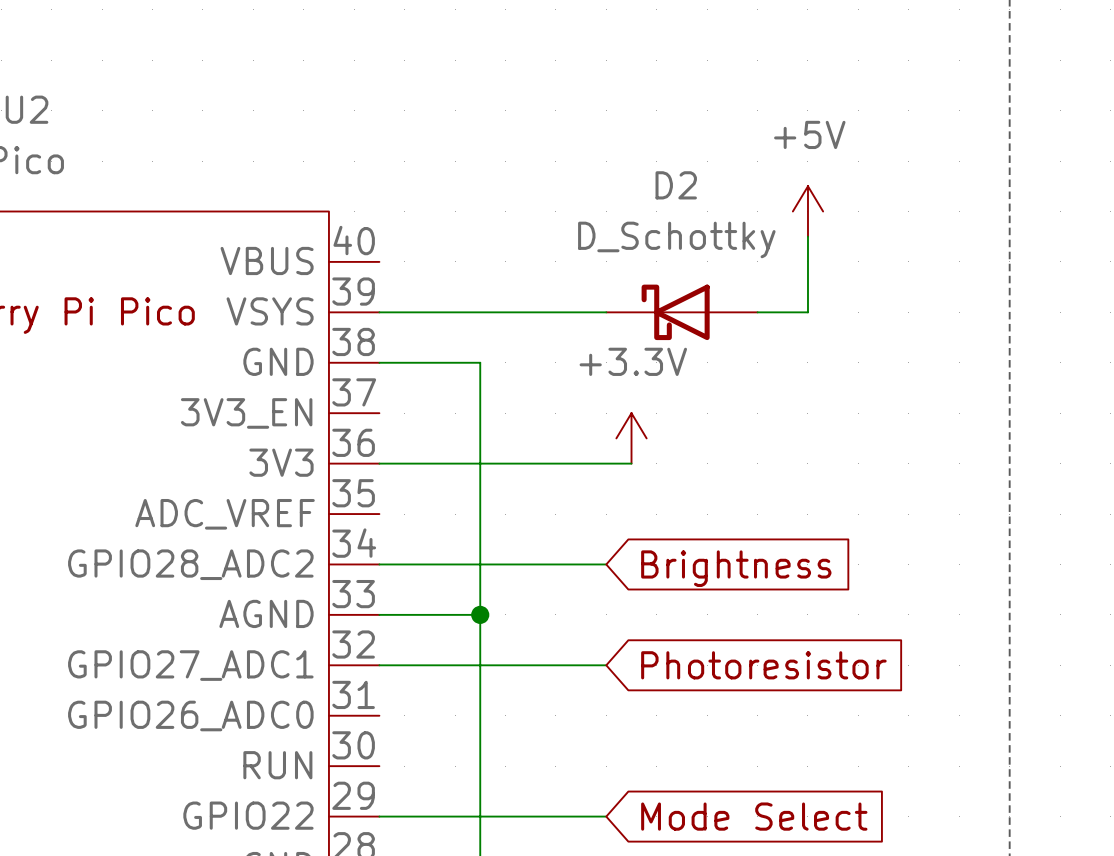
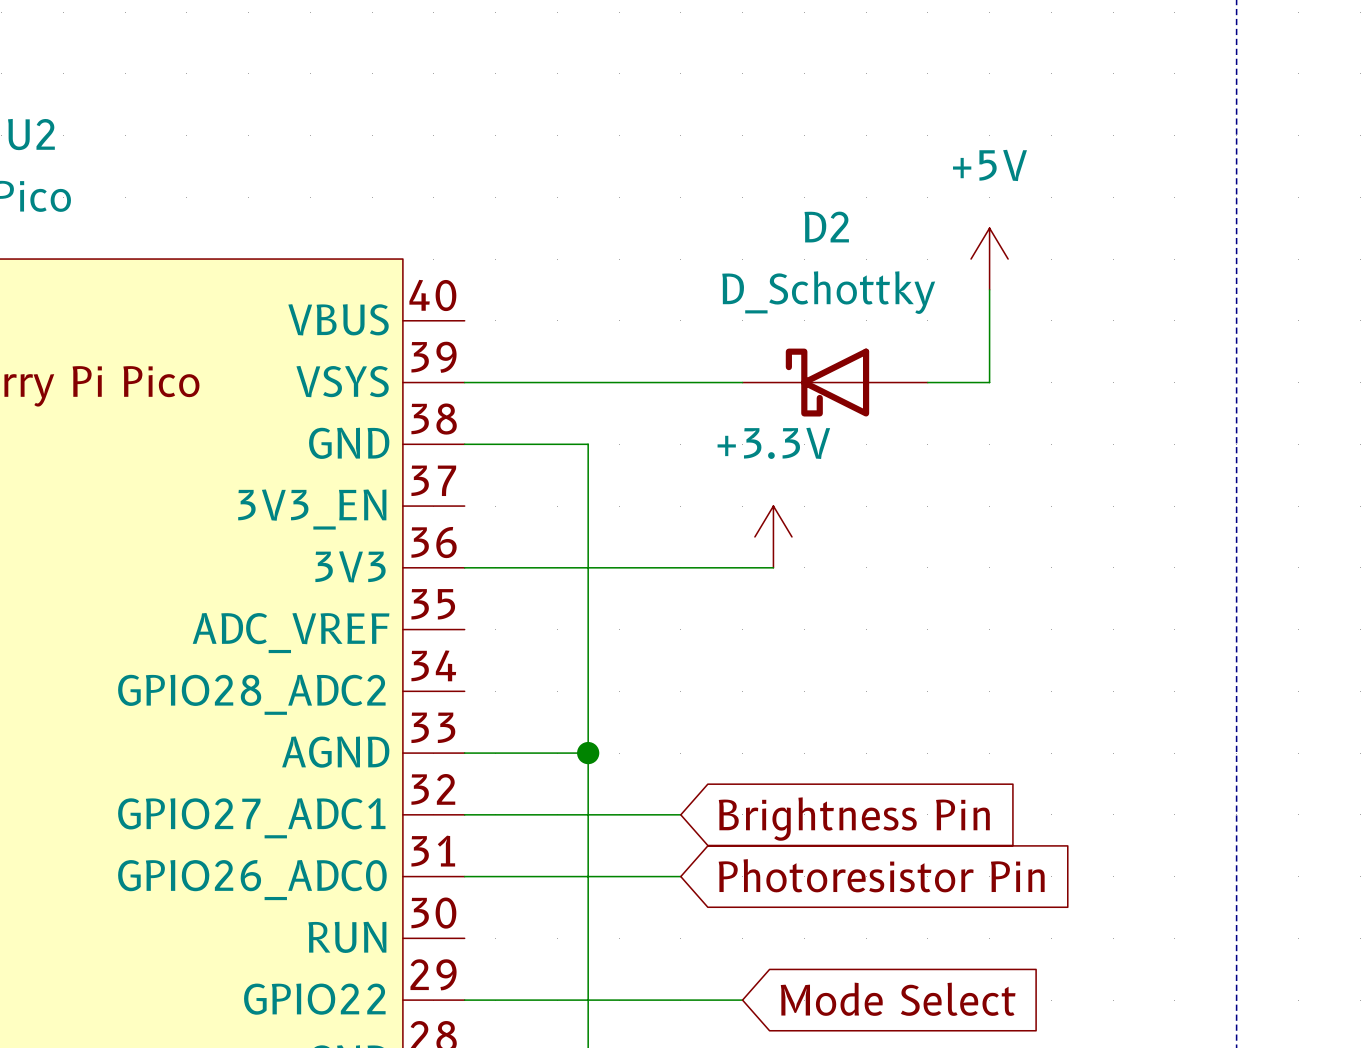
wire: (379, 564) (606, 564) -> none
global label: Brightness (736, 568) -> none
wire: (555, 665) (606, 665) -> none
global label: Photoresistor (763, 665) -> Photoresistor Pin (881, 875)
global label: none -> Brightness Pin (854, 819)
wire: none -> (464, 876) (680, 876)

